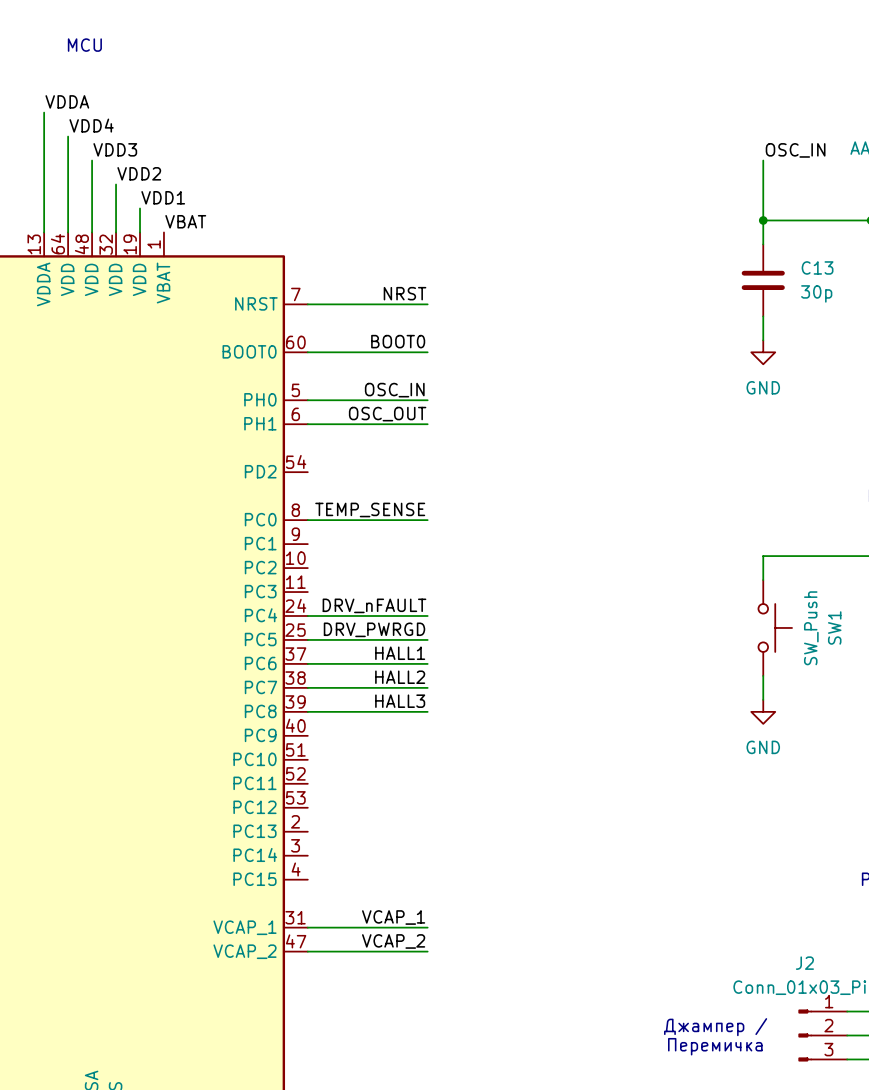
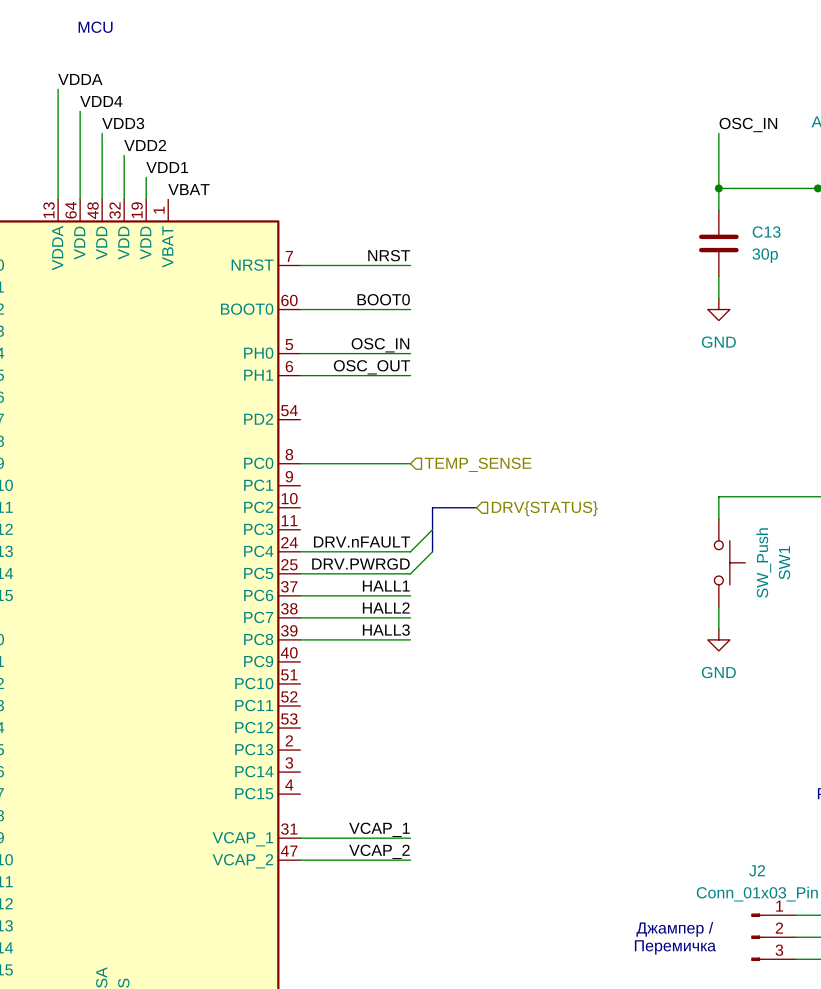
label: TEMP_SENSE (370, 509) -> none
hierarchical label: none -> TEMP_SENSE (478, 464)
bus: none -> (476, 507) (432, 507) (432, 551)
hierarchical label: none -> DRV{STATUS} (544, 508)
wire: none -> (432, 529) (410, 551)
label: DRV_nFAULT (374, 605) -> DRV.nFAULT (362, 542)
wire: none -> (432, 551) (410, 573)
label: DRV_PWRGD (374, 629) -> DRV.PWRGD (360, 564)

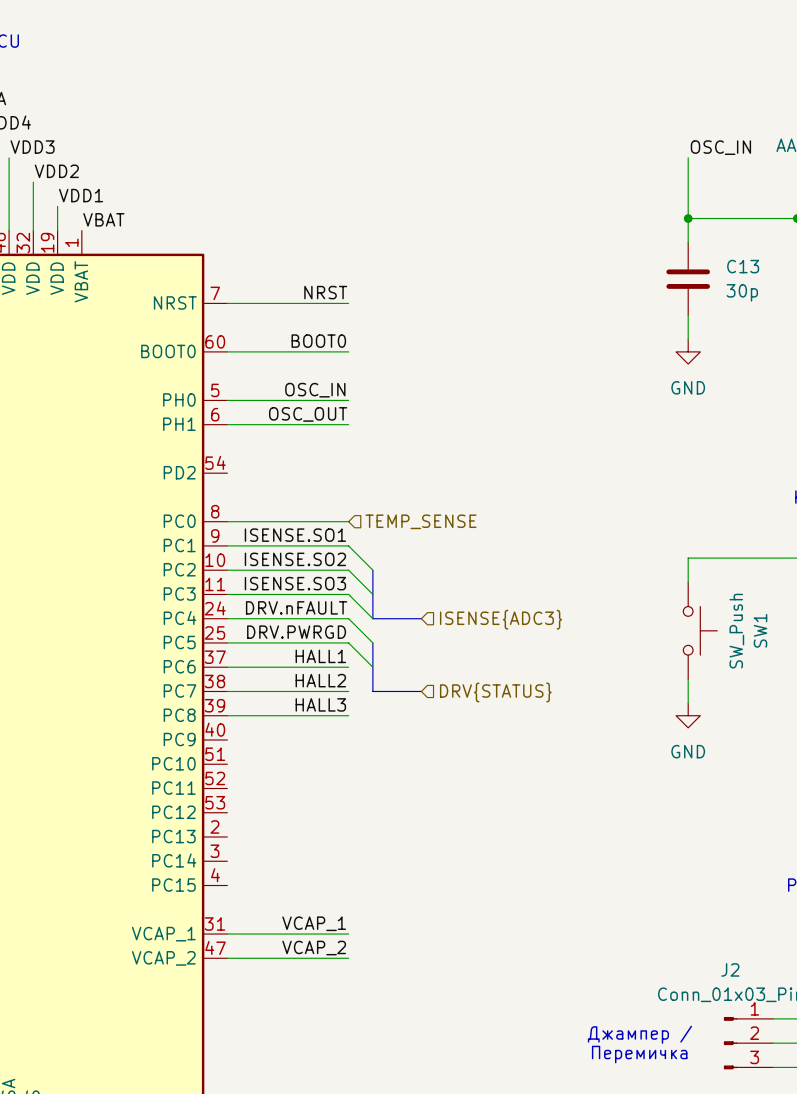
label: none -> ISENSE.SO1 (295, 535)
wire: none -> (227, 545) (348, 545) (372, 570)
label: none -> ISENSE.SO2 (295, 559)
wire: none -> (227, 570) (348, 570) (372, 594)
bus: (432, 507) (476, 507) -> (372, 618) (421, 618)
hierarchical label position: DRV{STATUS} (544, 508) -> DRV{STATUS} (495, 692)
label: none -> ISENSE.SO3 (295, 583)
wire: none -> (227, 594) (348, 594) (372, 618)
wire: (432, 529) (410, 551) -> (372, 642) (348, 618)
wire: (432, 551) (410, 573) -> (372, 667) (348, 642)
hierarchical label: none -> ISENSE{ADC3} (500, 619)
bus: none -> (372, 642) (372, 691) (421, 691)

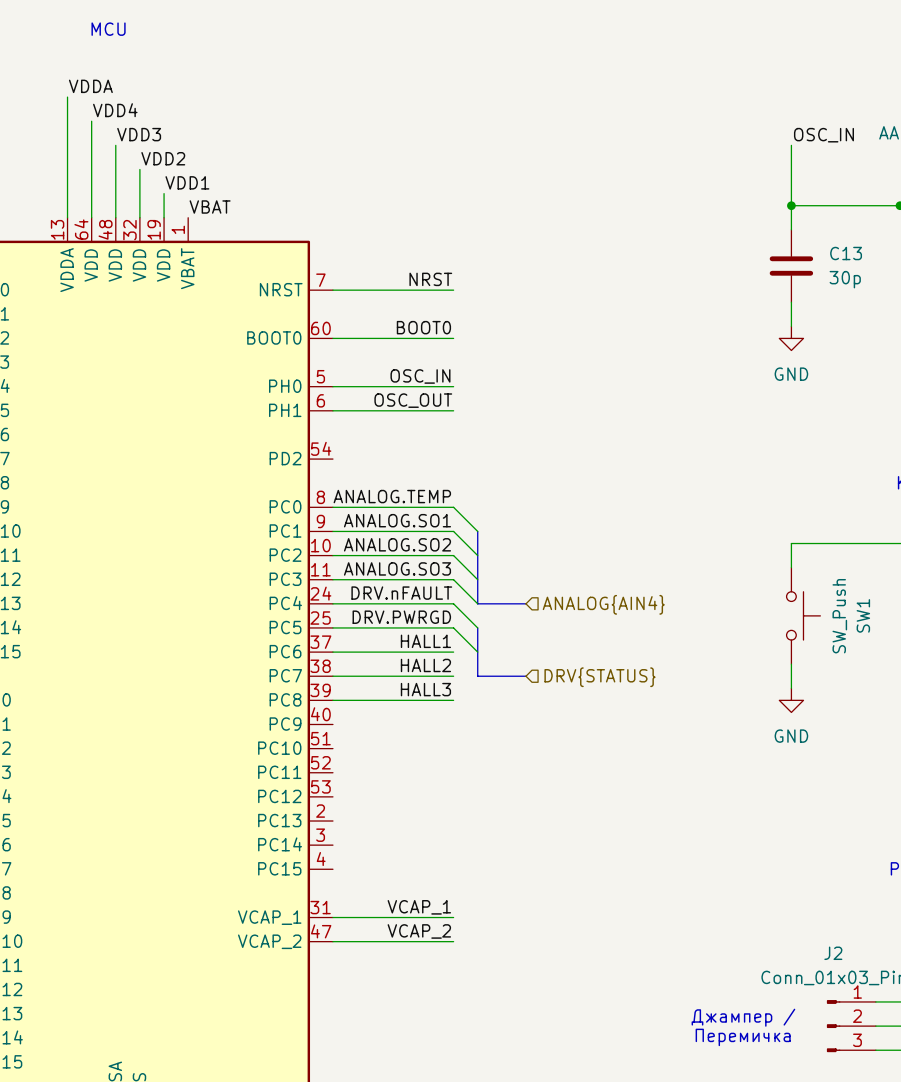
label: none -> ANALOG.TEMP (392, 496)
wire: none -> (453, 507) (477, 531)
hierarchical label: TEMP_SENSE (421, 521) -> none
label: ISENSE.SO1 (295, 535) -> ANALOG.SO1 (397, 520)
bus: none -> (477, 531) (477, 555)
label: ISENSE.SO2 (295, 559) -> ANALOG.SO2 (397, 544)
label: ISENSE.SO3 (295, 583) -> ANALOG.SO3 (397, 568)
hierarchical label: ISENSE{ADC3} (500, 619) -> ANALOG{AIN4} (603, 604)

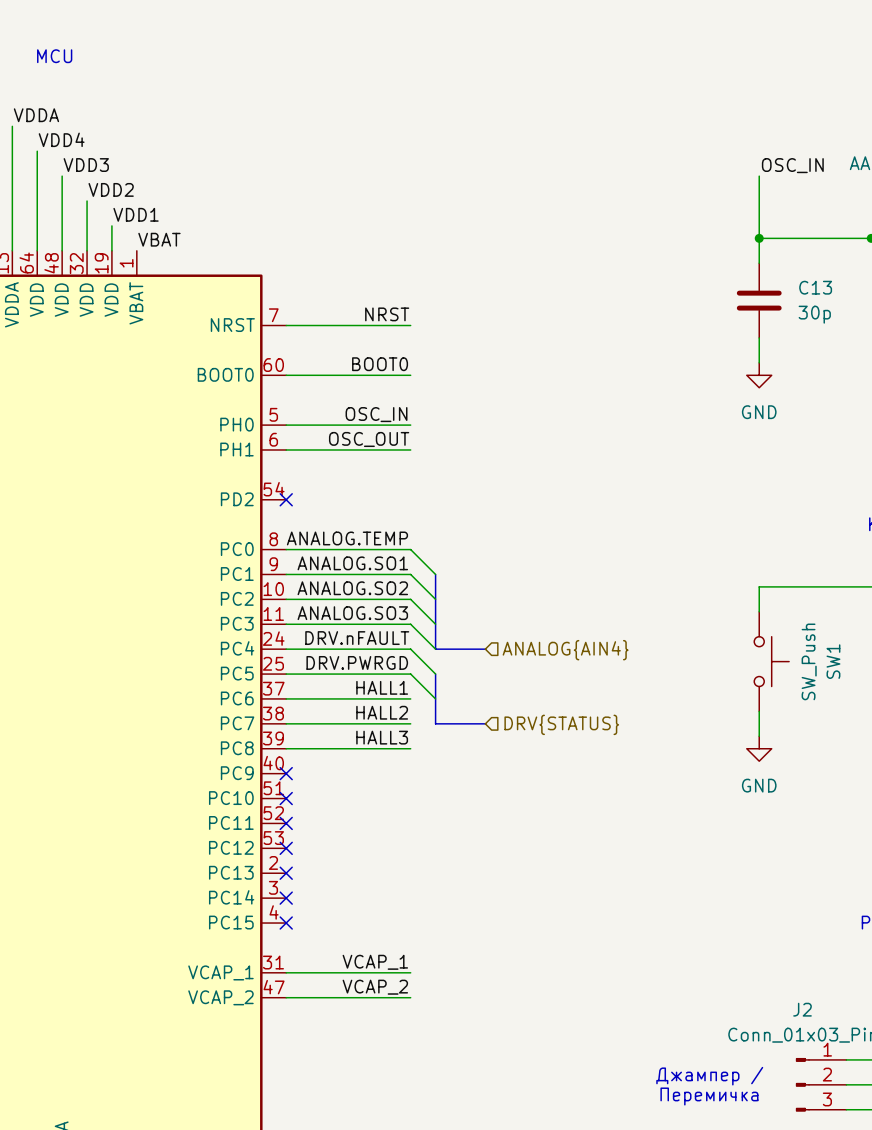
no-connect mark: none -> (286, 499)
no-connect mark: none -> (286, 773)
no-connect mark: none -> (286, 798)
no-connect mark: none -> (286, 823)
no-connect mark: none -> (286, 848)
no-connect mark: none -> (286, 873)
no-connect mark: none -> (286, 898)
no-connect mark: none -> (286, 923)

